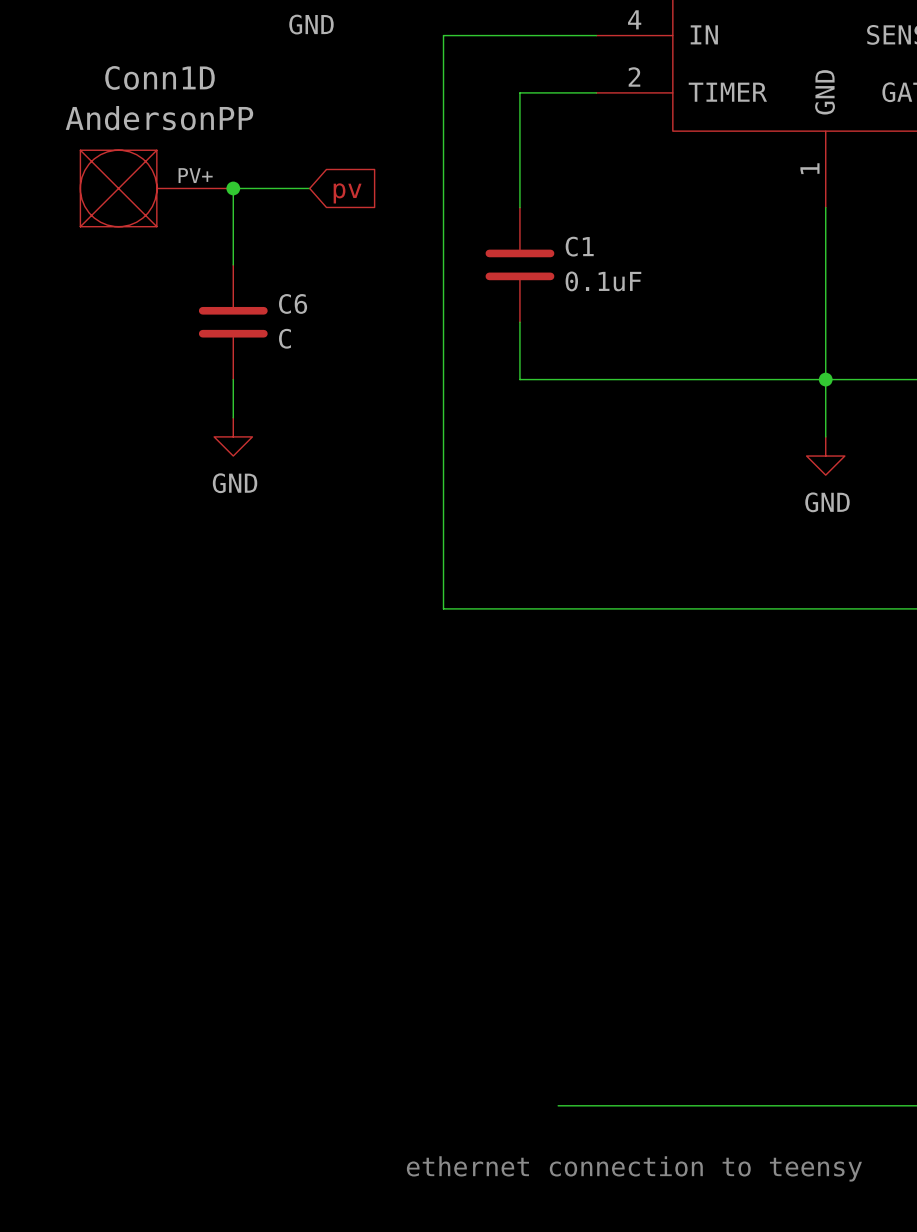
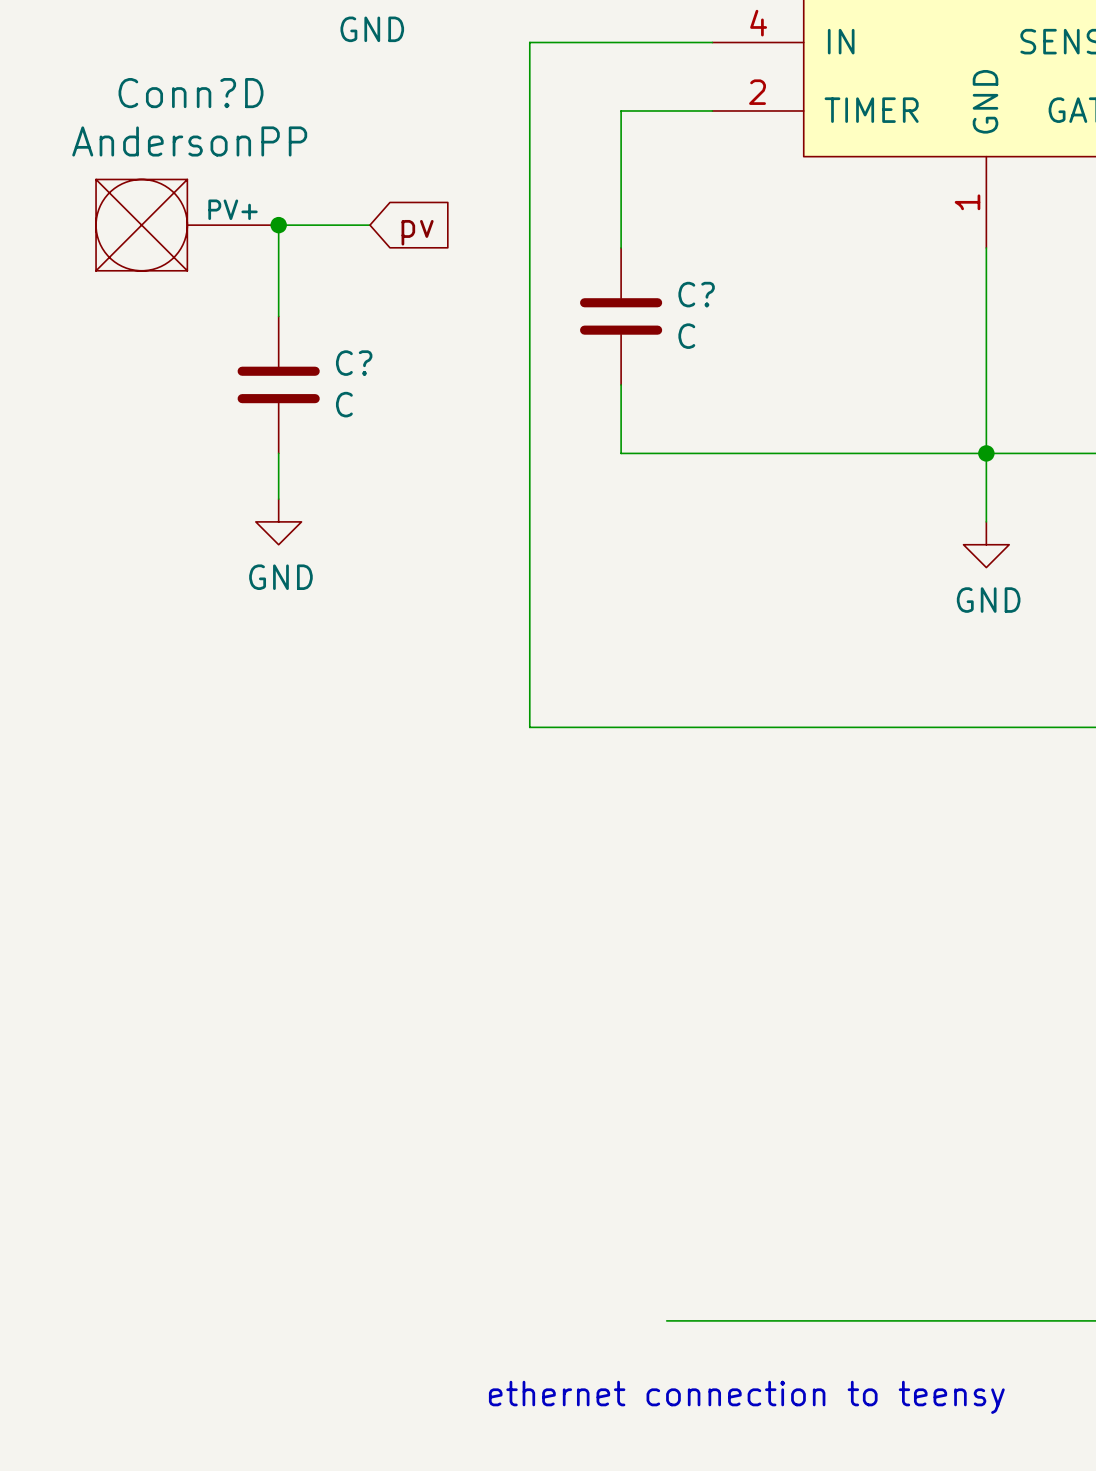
Conn1D name: Conn1D (159, 77) -> Conn?D (191, 93)
C1 name: C1 (579, 246) -> C? (696, 294)
C1 value: 0.1uF (603, 281) -> C (686, 336)
C6 name: C6 (293, 303) -> C? (354, 363)

